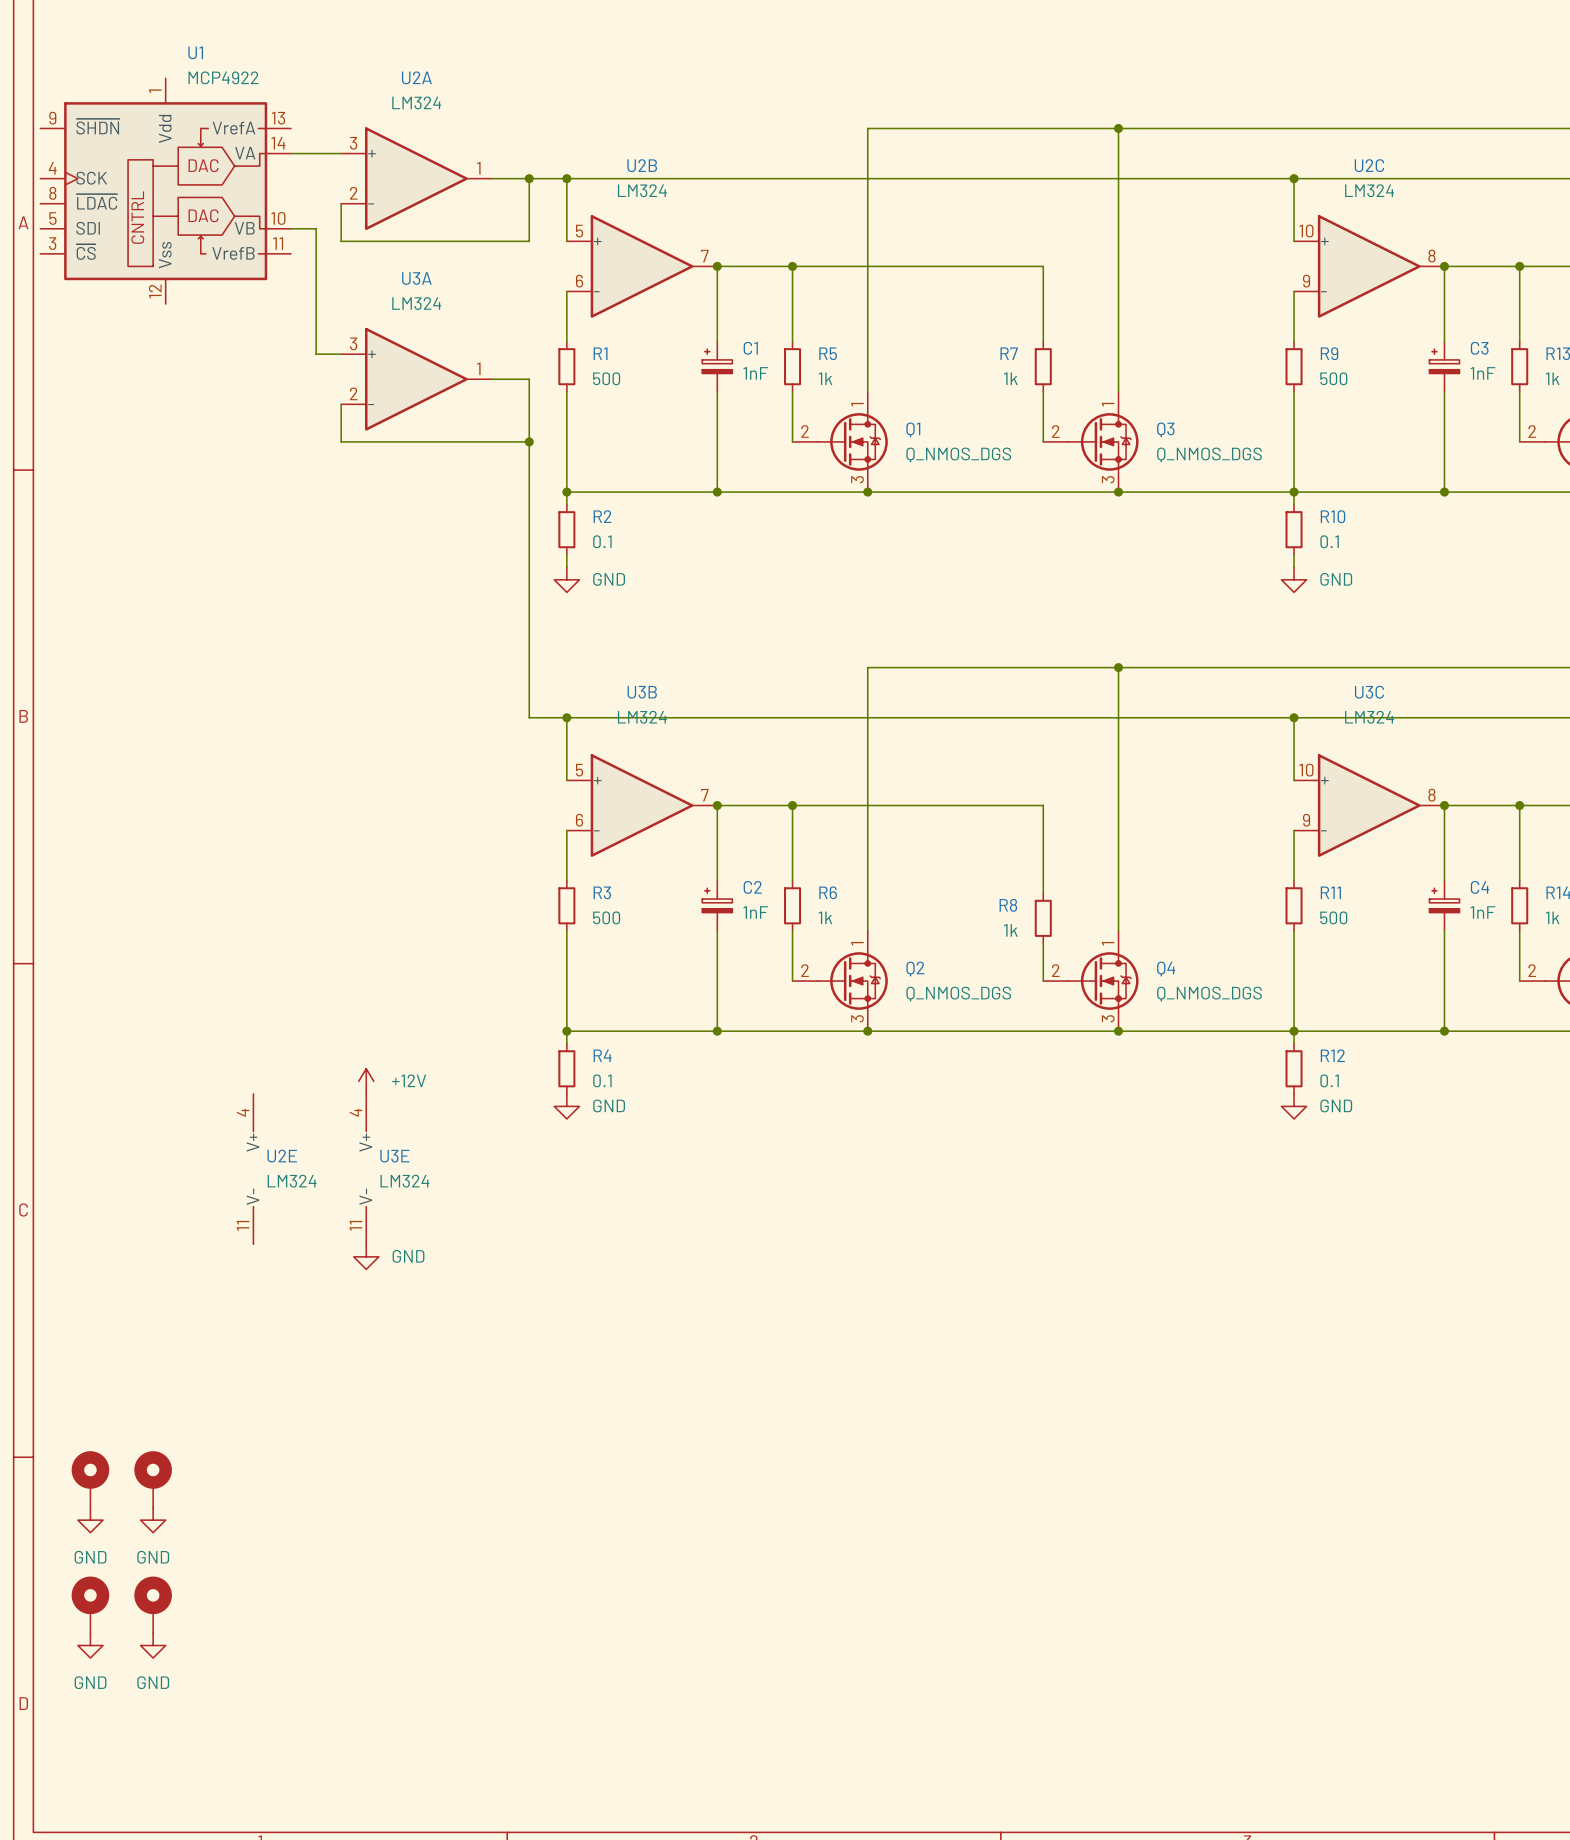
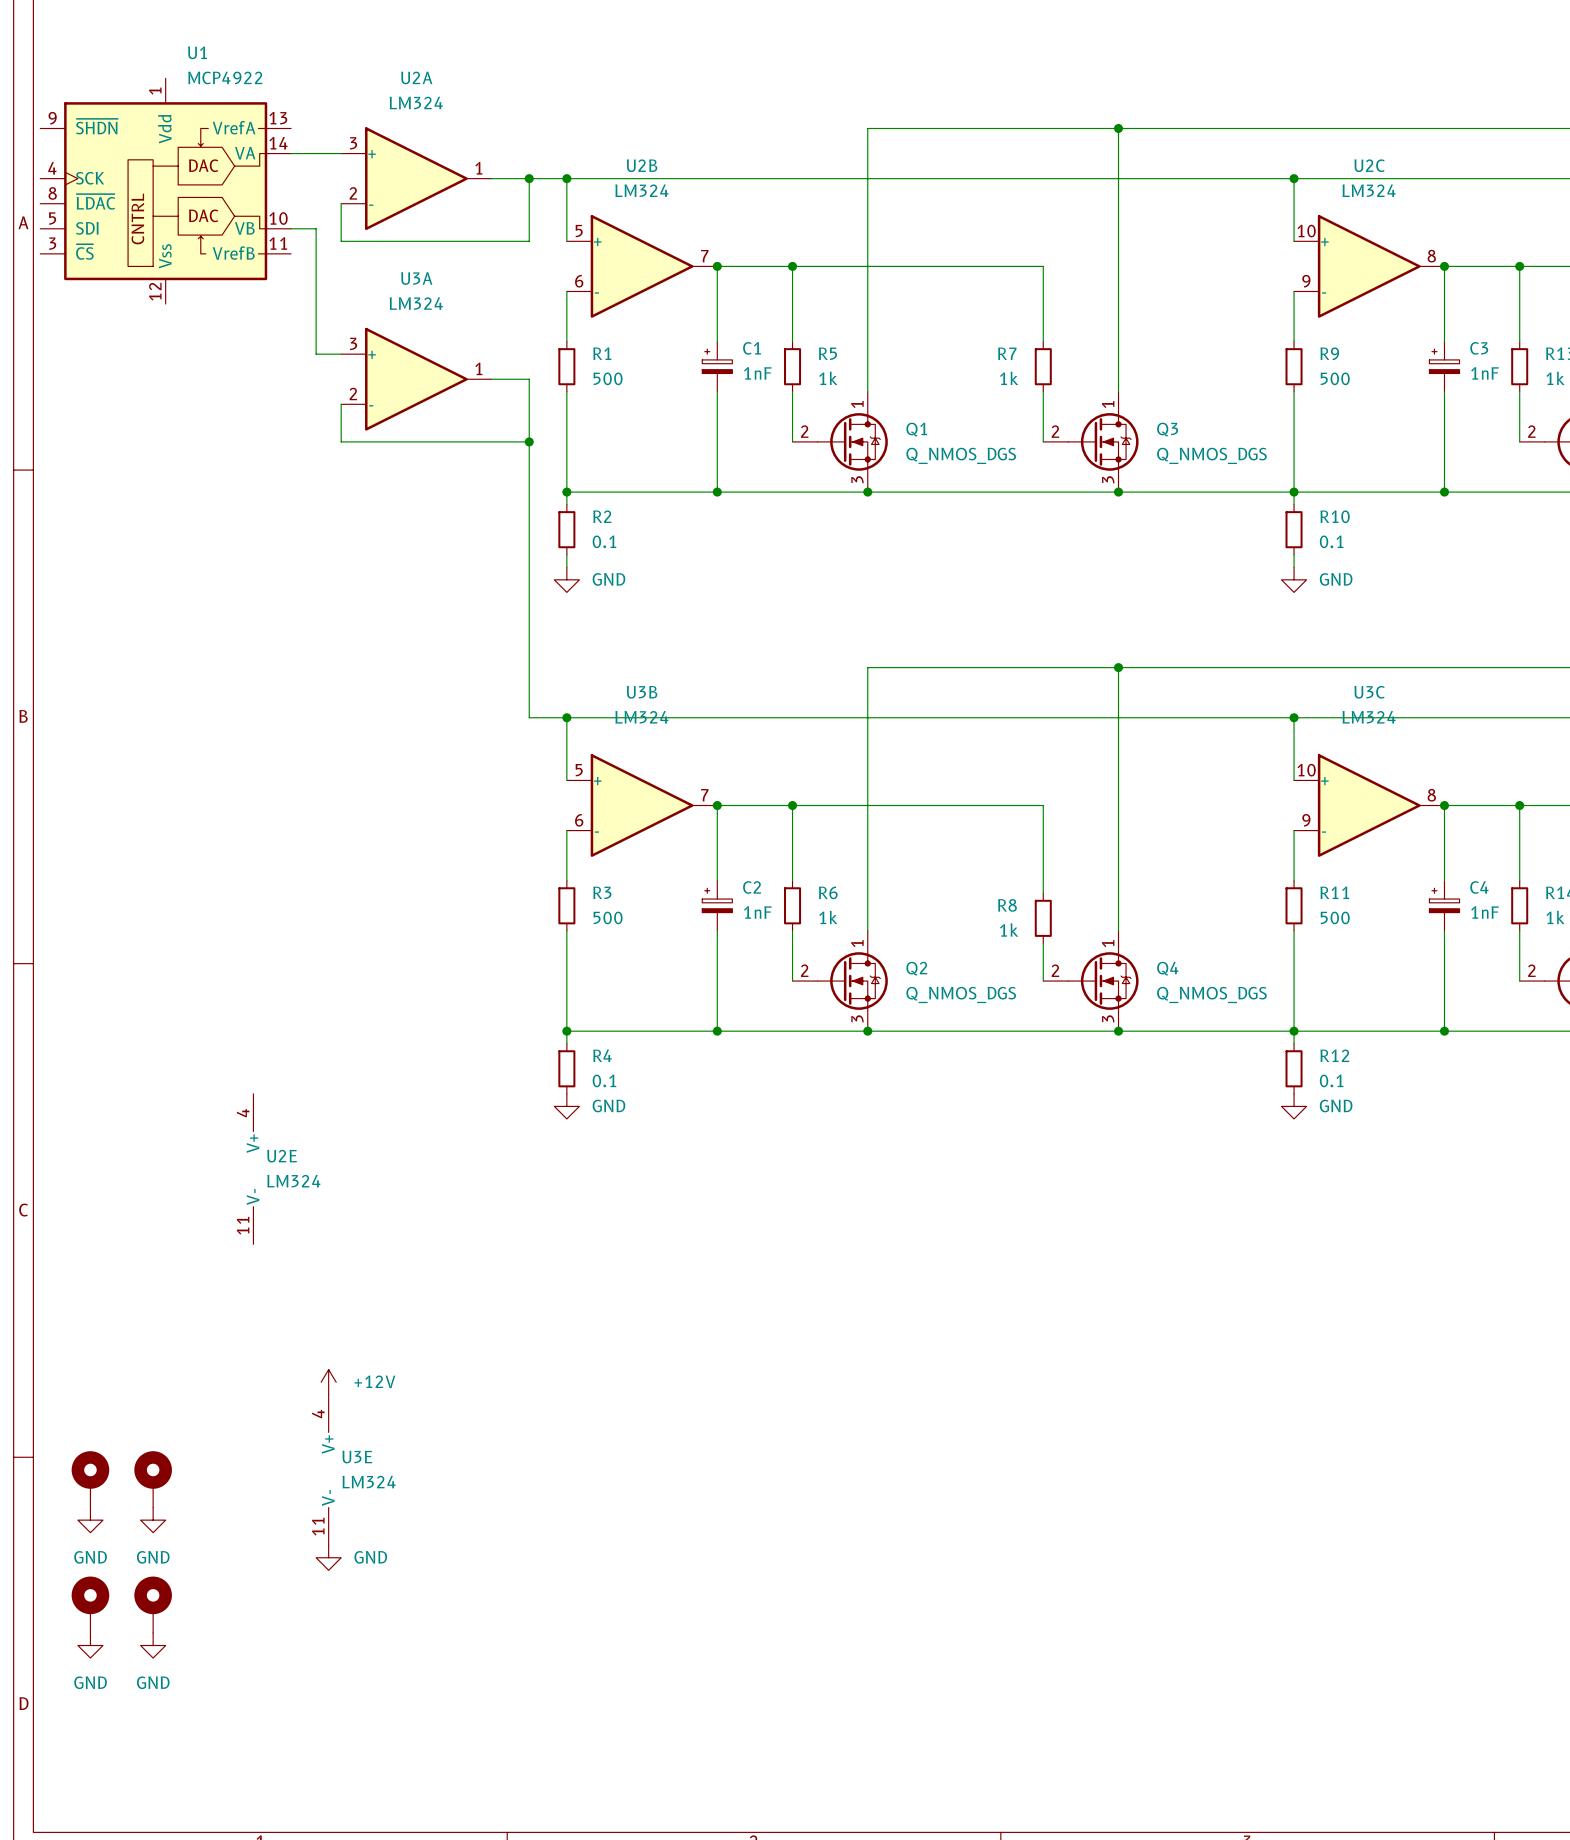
power symbol: +12V (366, 1081) -> none
U3E position: (366, 1169) -> (328, 1469)
power symbol: GND (366, 1256) -> none
power symbol: none -> +12V (328, 1382)
power symbol: none -> GND (328, 1557)

